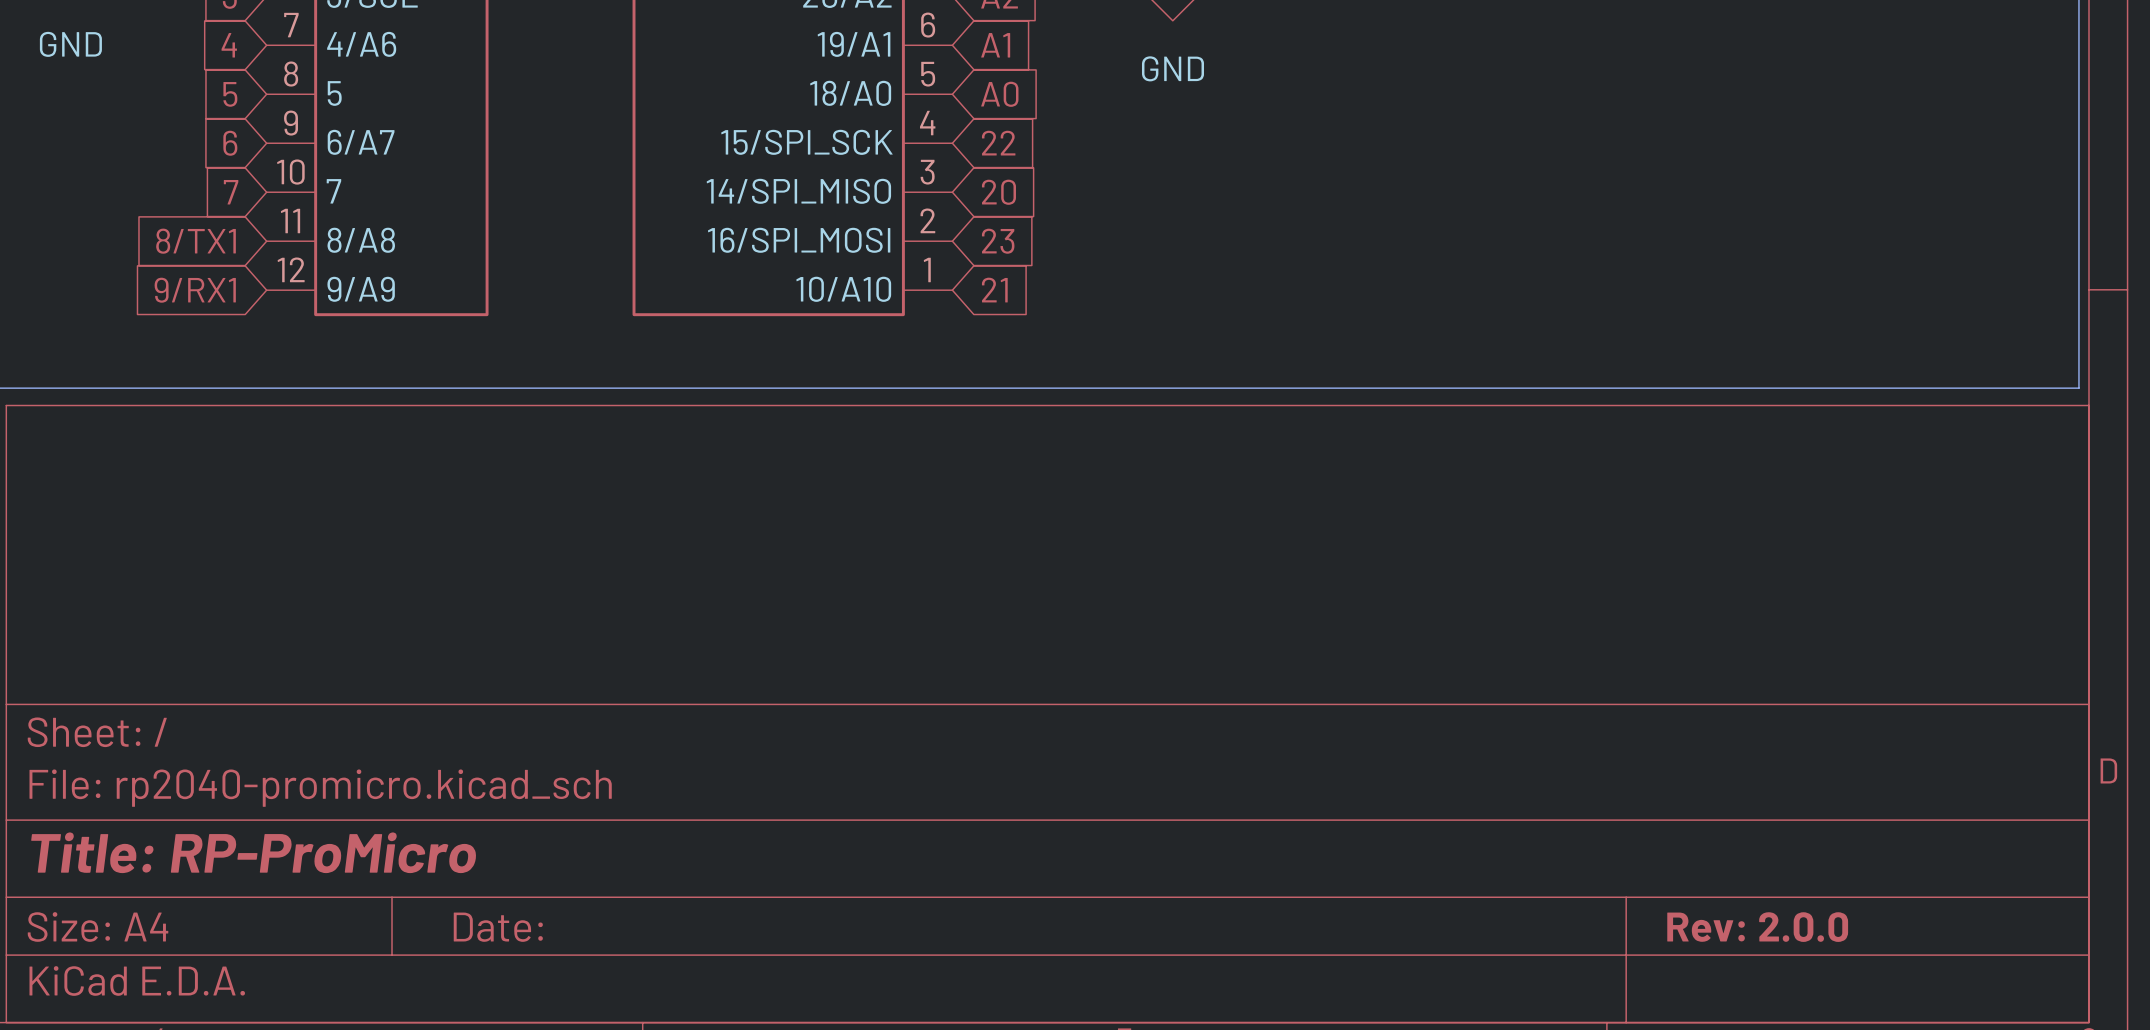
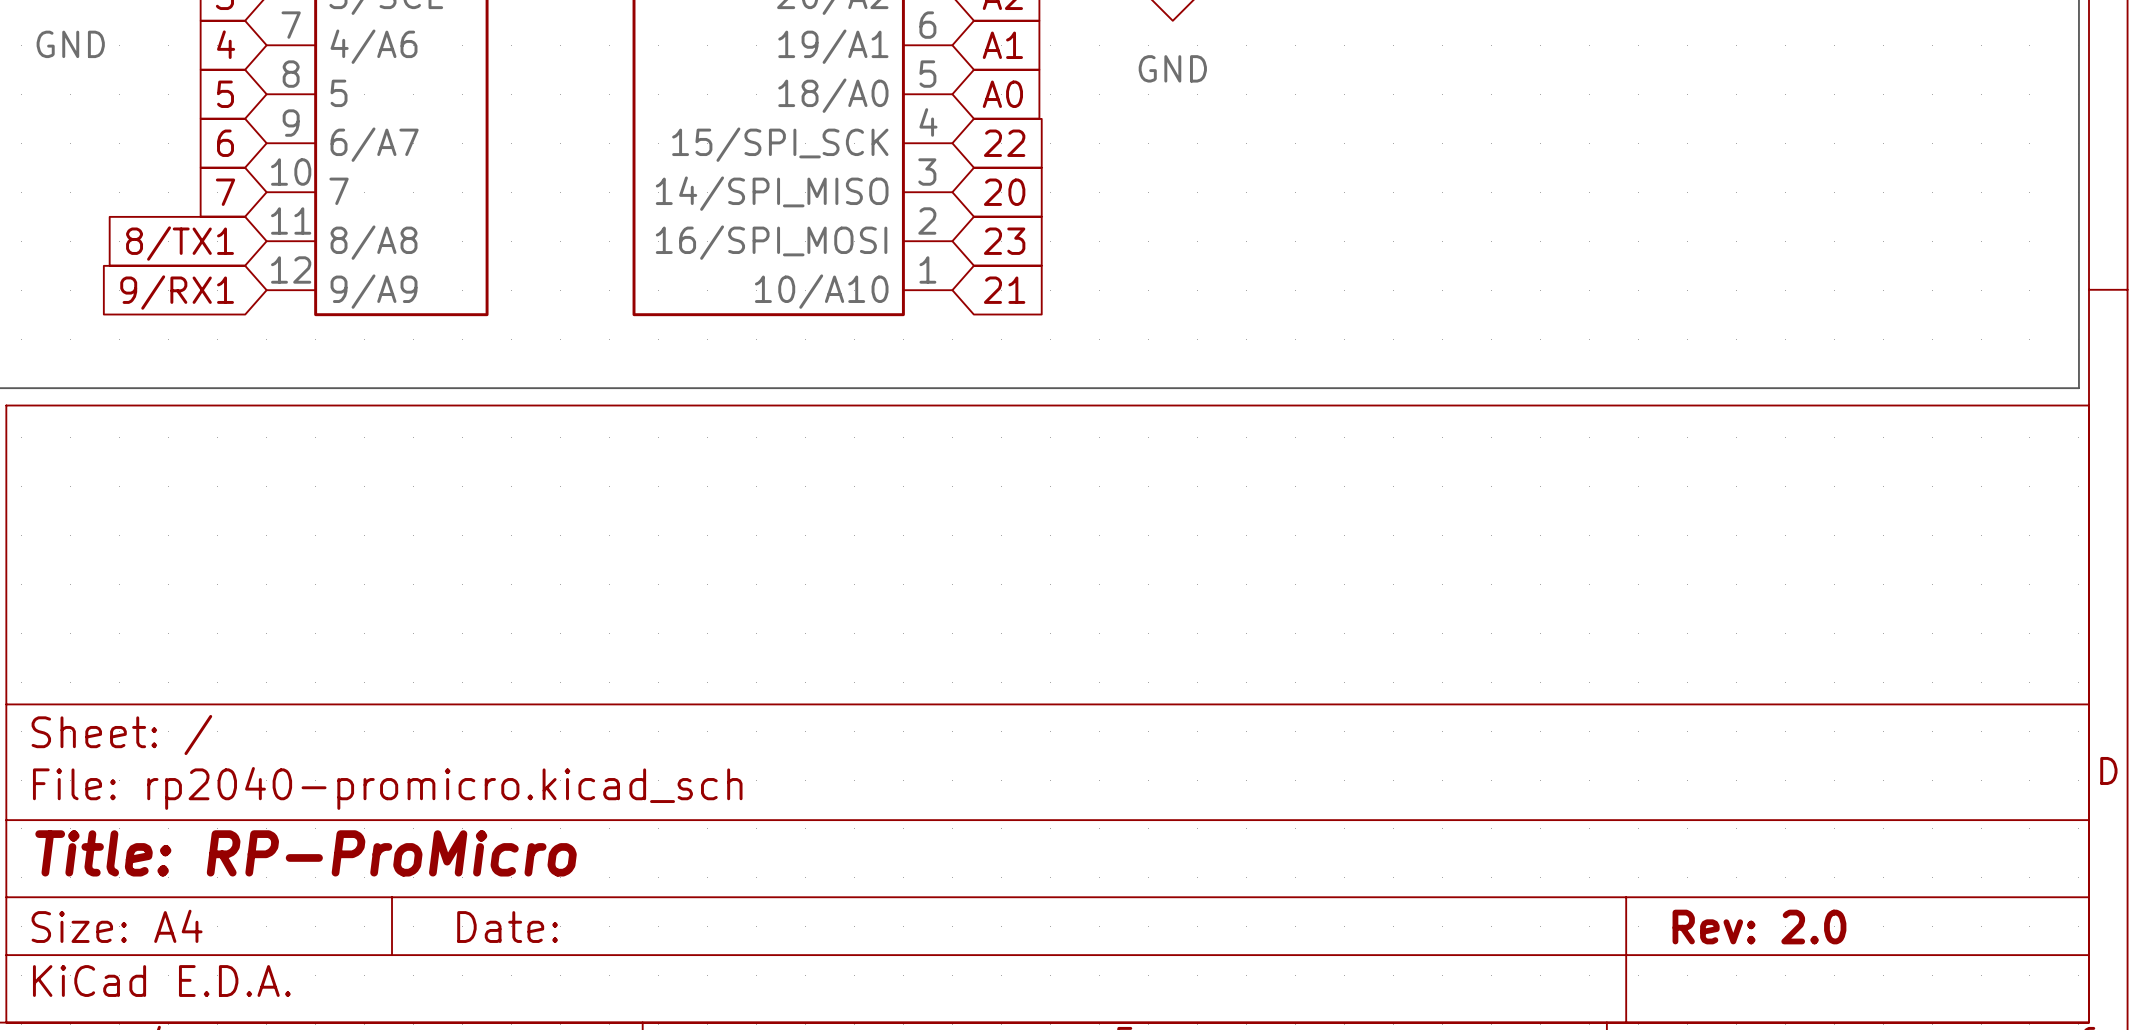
title block: Rev: 2.0.0 (1757, 927) -> Rev: 2.0 (1759, 927)

